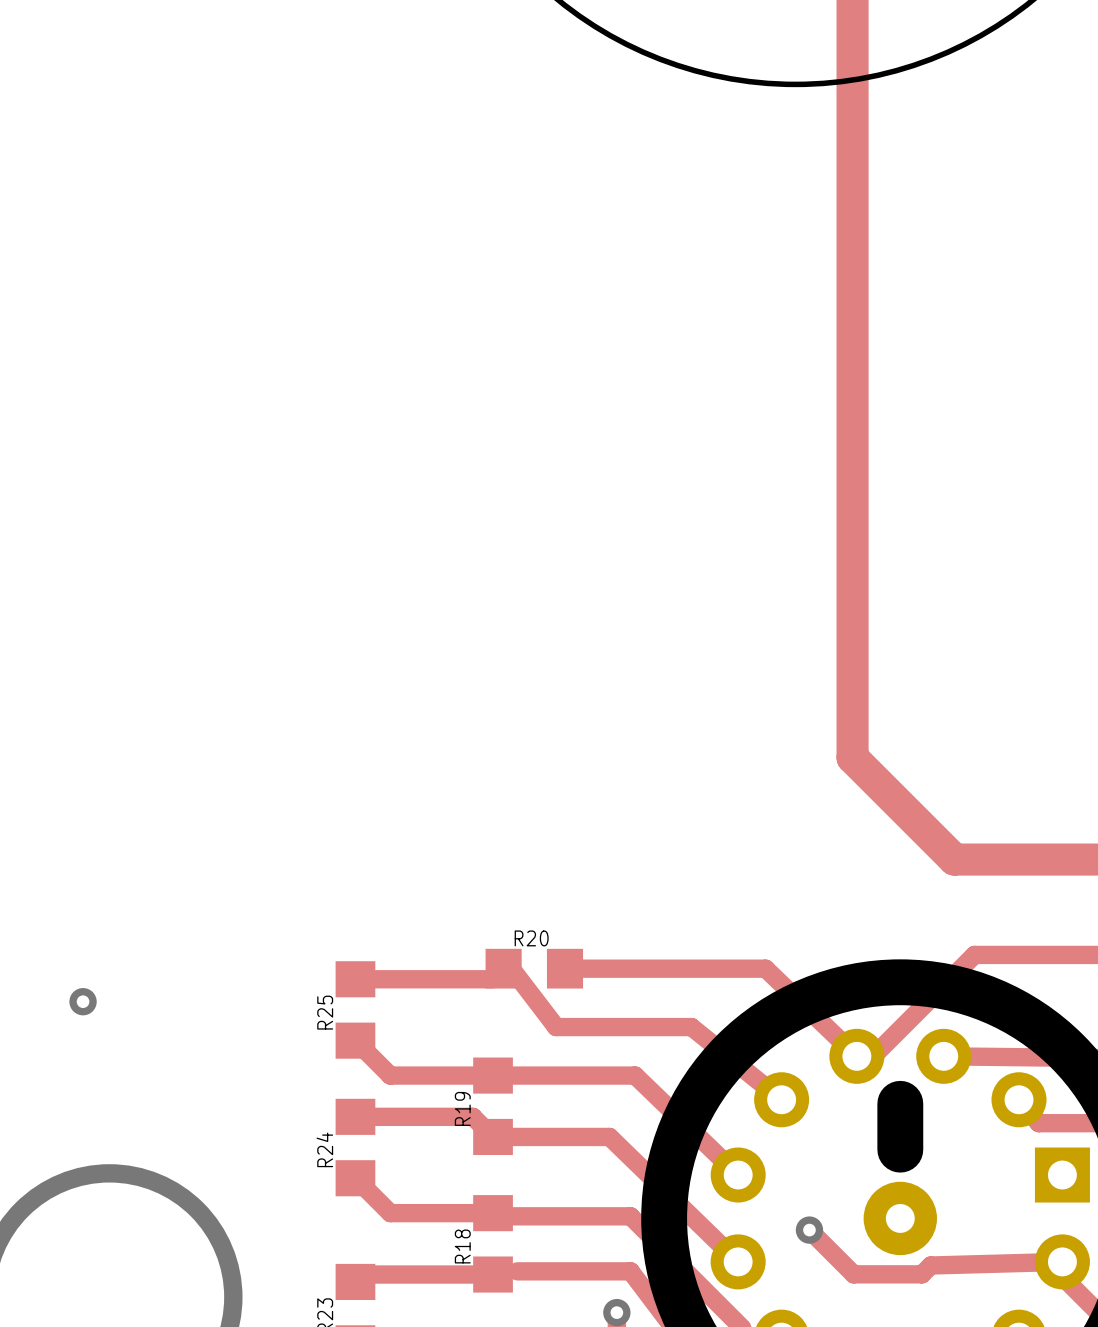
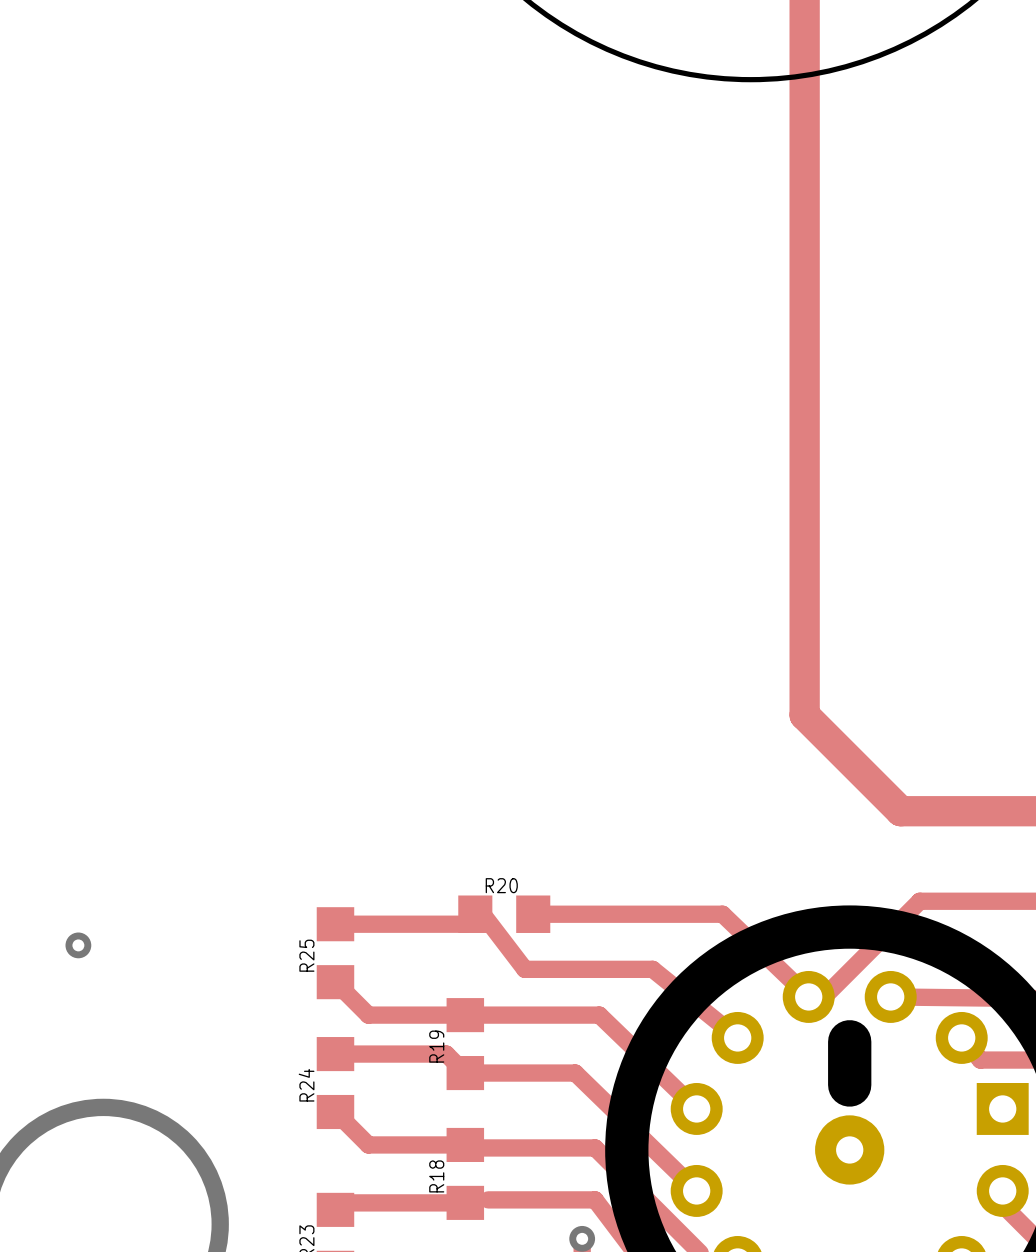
track: (809, 1230) (853, 1274) (921, 1274) (930, 1265) (1062, 1261) -> none
via: (809, 1230) -> none

